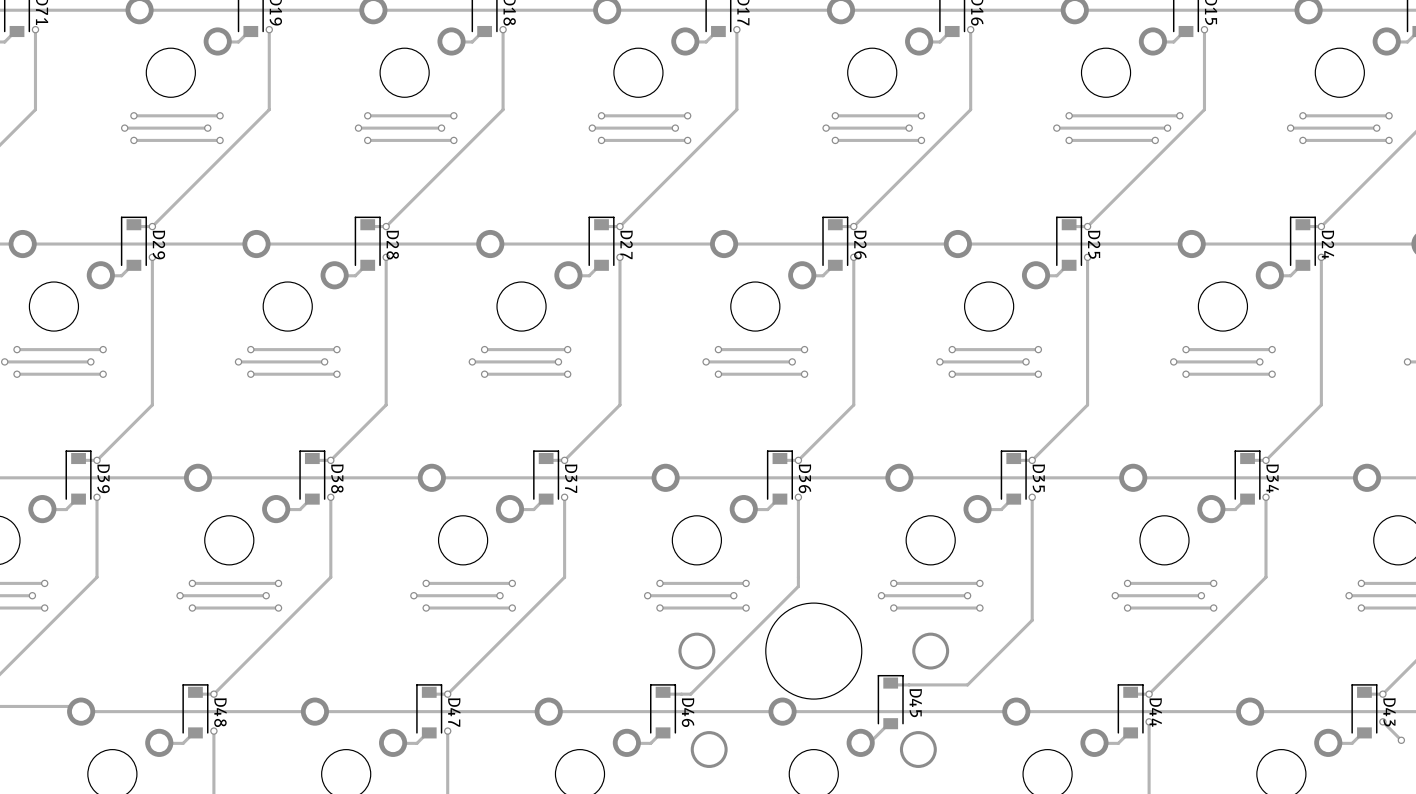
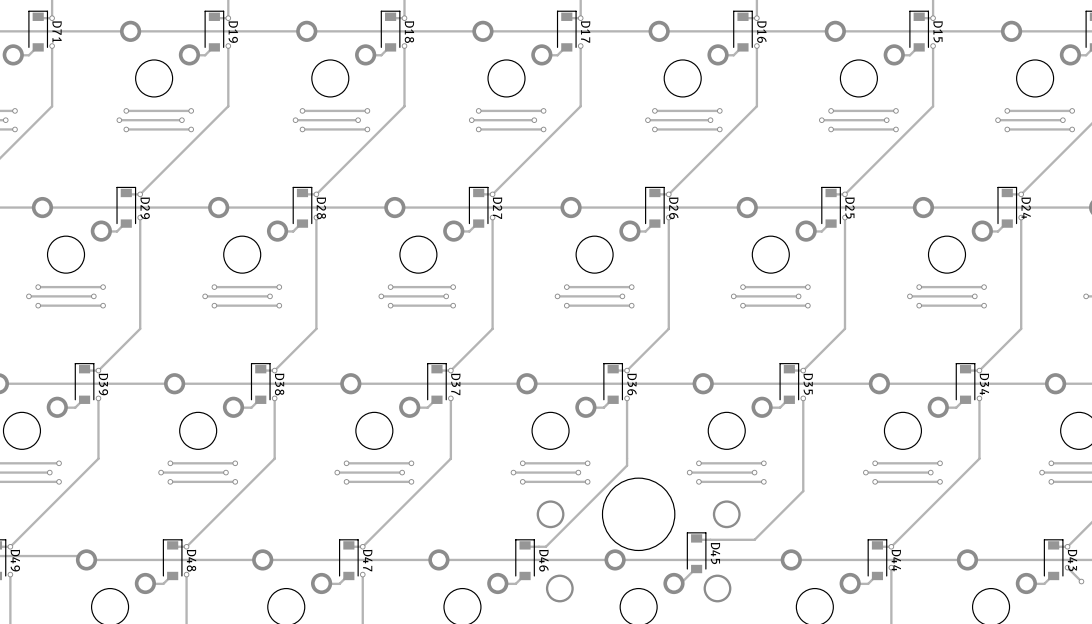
via: none -> (895, 110)
track: (1179, 115) (1155, 115) -> none
via: (1179, 115) -> none
via: none -> (886, 120)
track: (1167, 128) (1142, 128) -> none
via: (1167, 128) -> none

